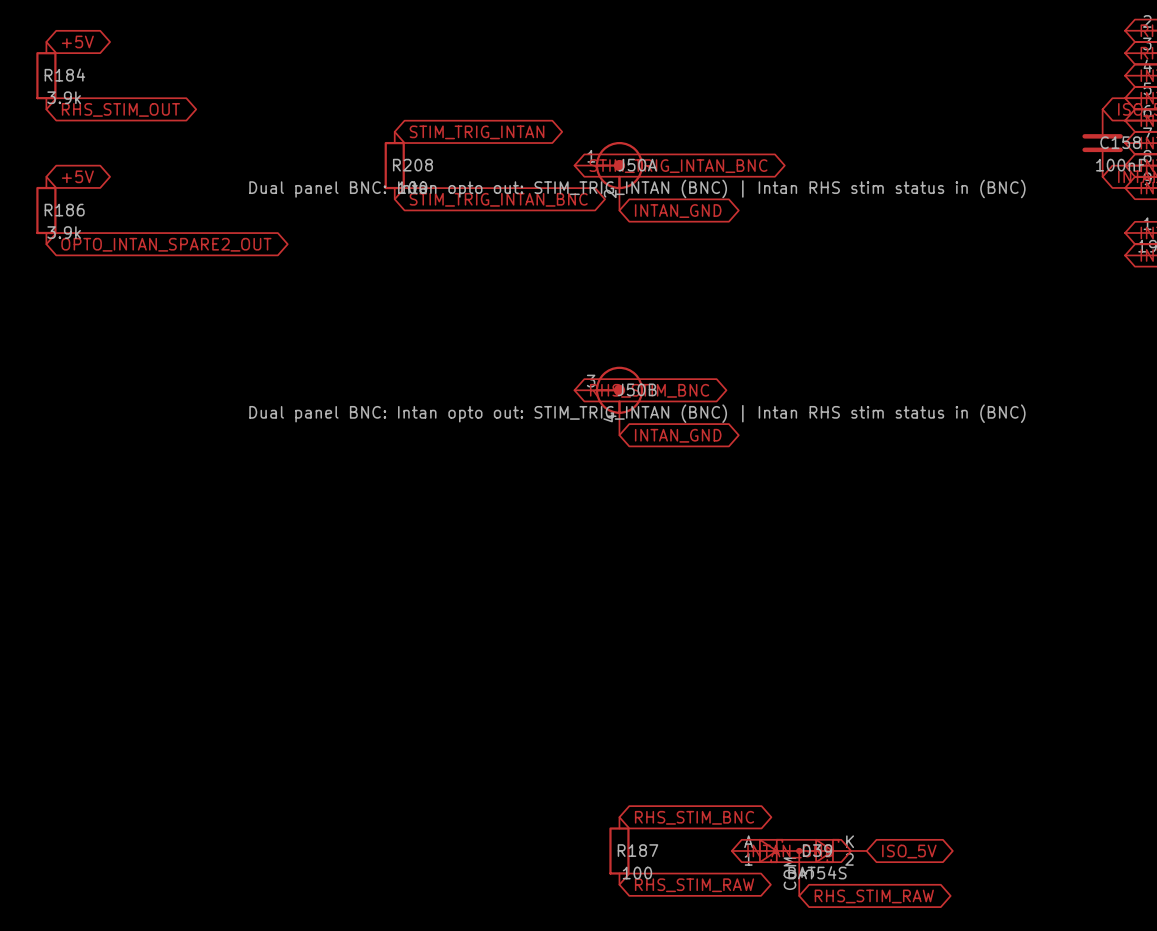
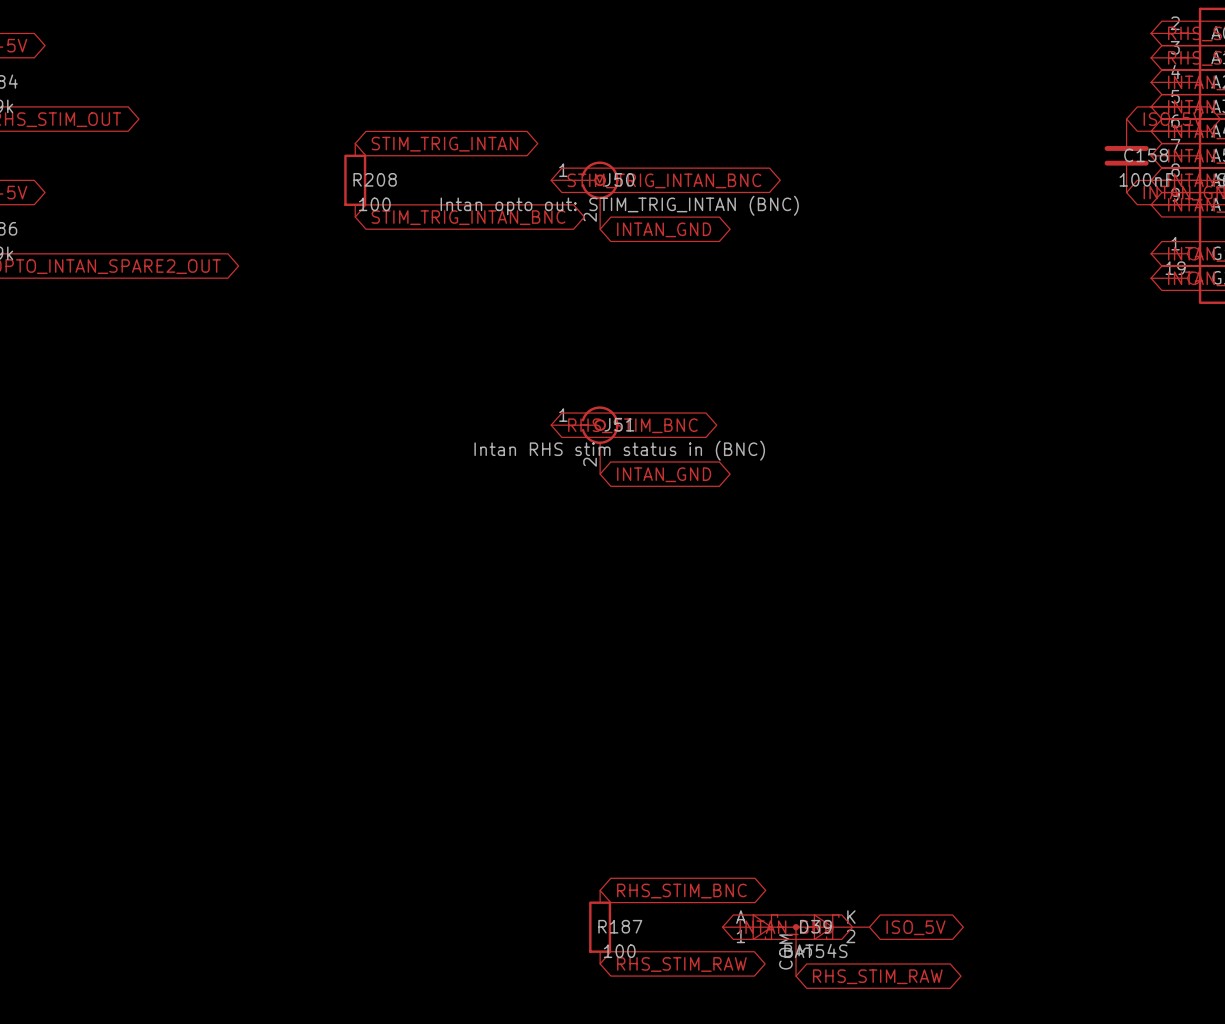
J50A: Dual panel BNC: Intan opto out: STIM_TRIG_INTAN (BNC) | Intan RHS stim status in (BNC) (608, 176) -> none
J50: none -> Intan opto out: STIM_TRIG_INTAN (BNC) (584, 195)
J50B: Dual panel BNC: Intan opto out: STIM_TRIG_INTAN (BNC) | Intan RHS stim status in (BNC) (608, 400) -> none
J51: none -> Intan RHS stim status in (BNC) (584, 440)

